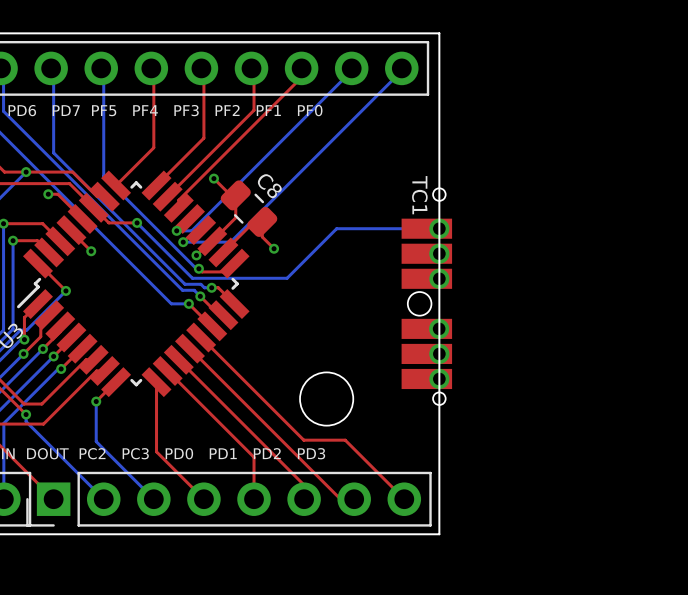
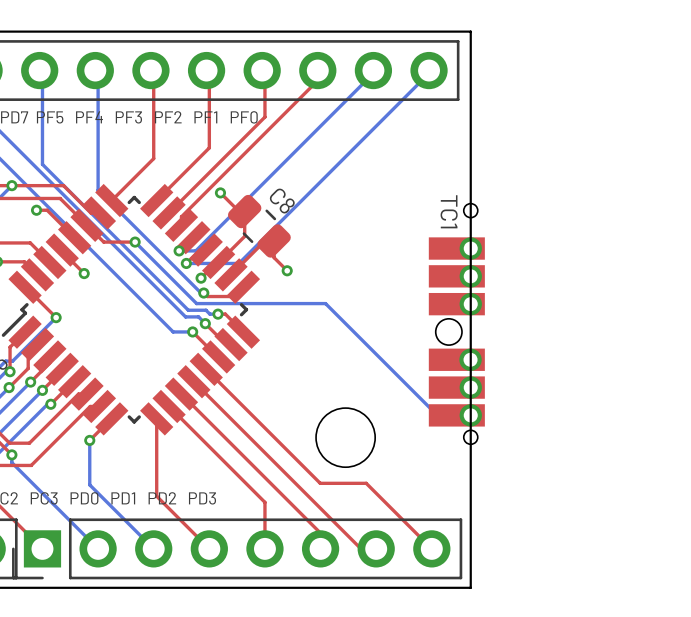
bottom track: (437, 228) (336, 228) (287, 278) -> (465, 415) (437, 415) (325, 303) (301, 303)

